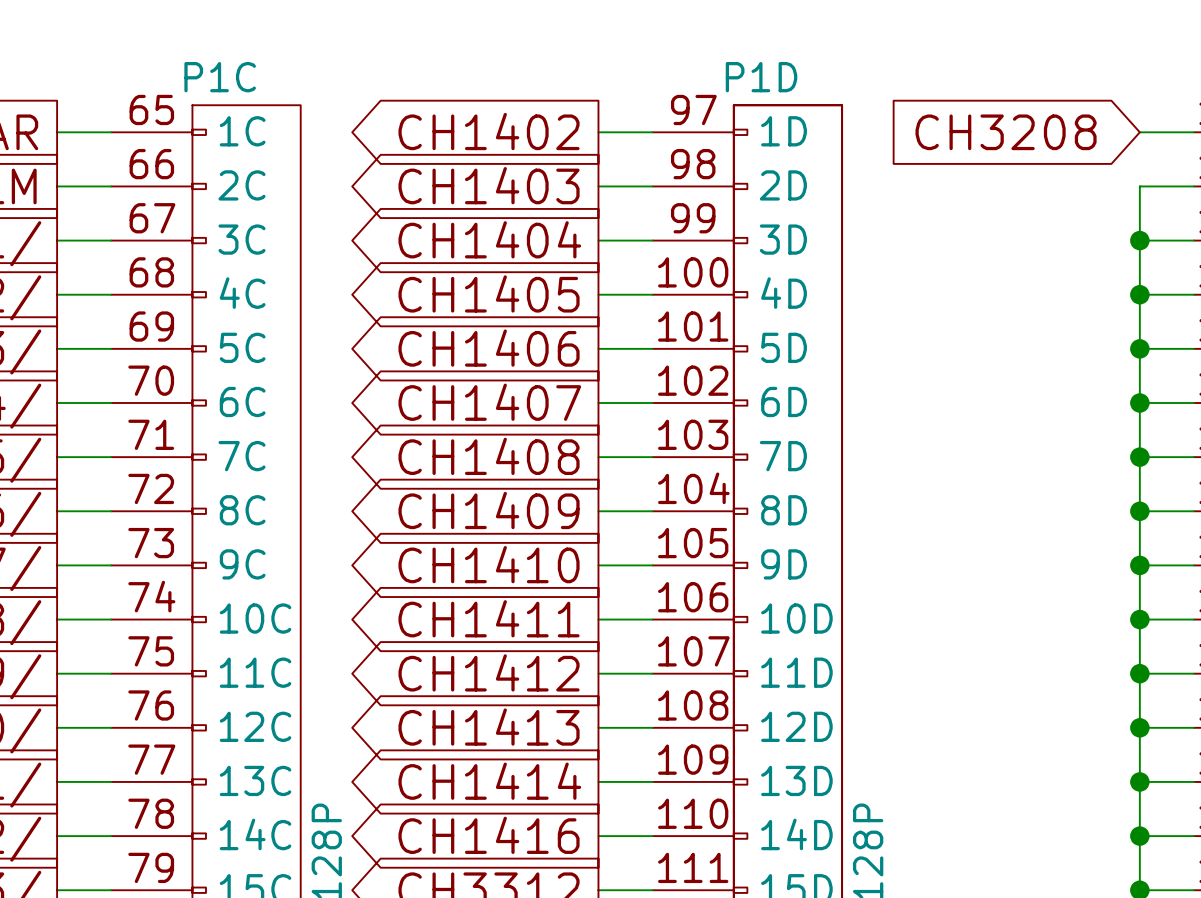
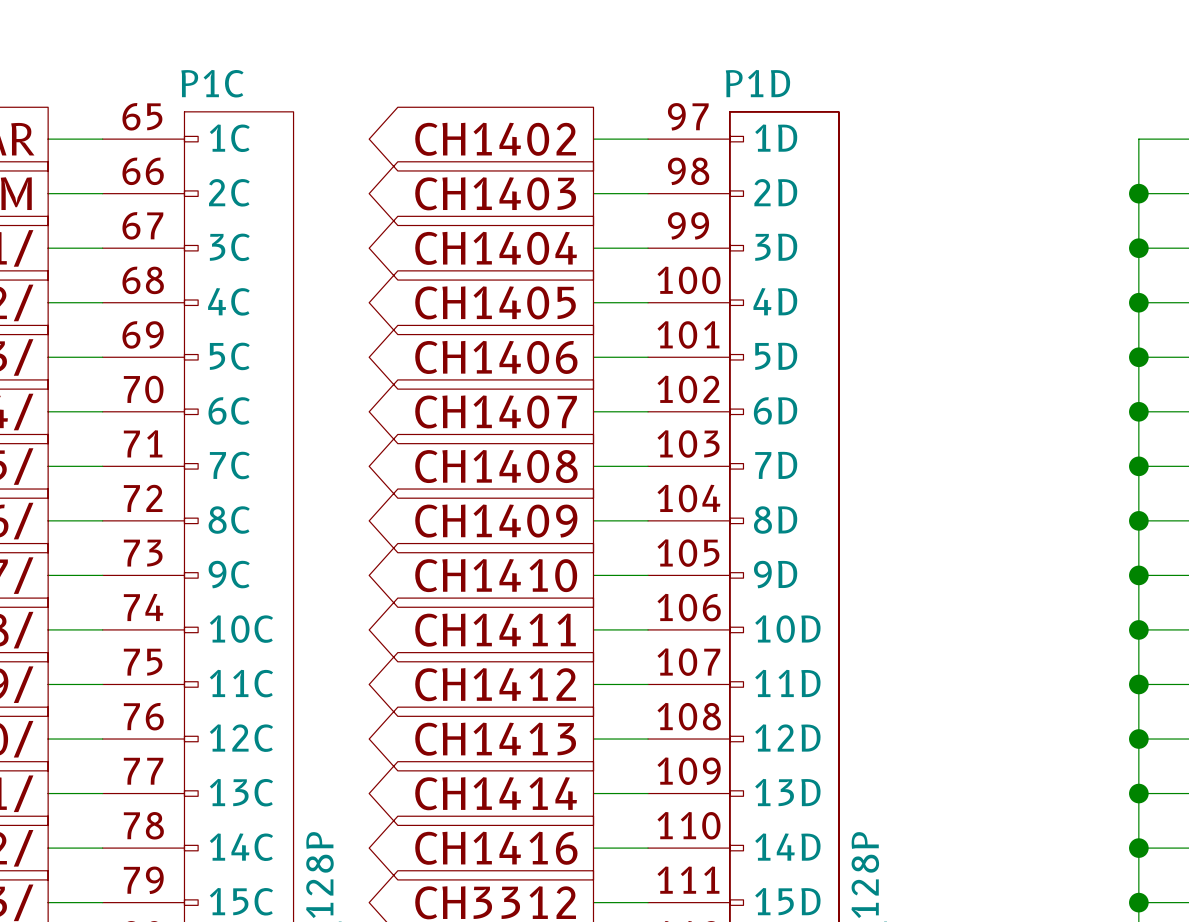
global label: CH3208 (1006, 132) -> none
wire: none -> (1138, 139) (1138, 193)
junction: none -> (1138, 193)

